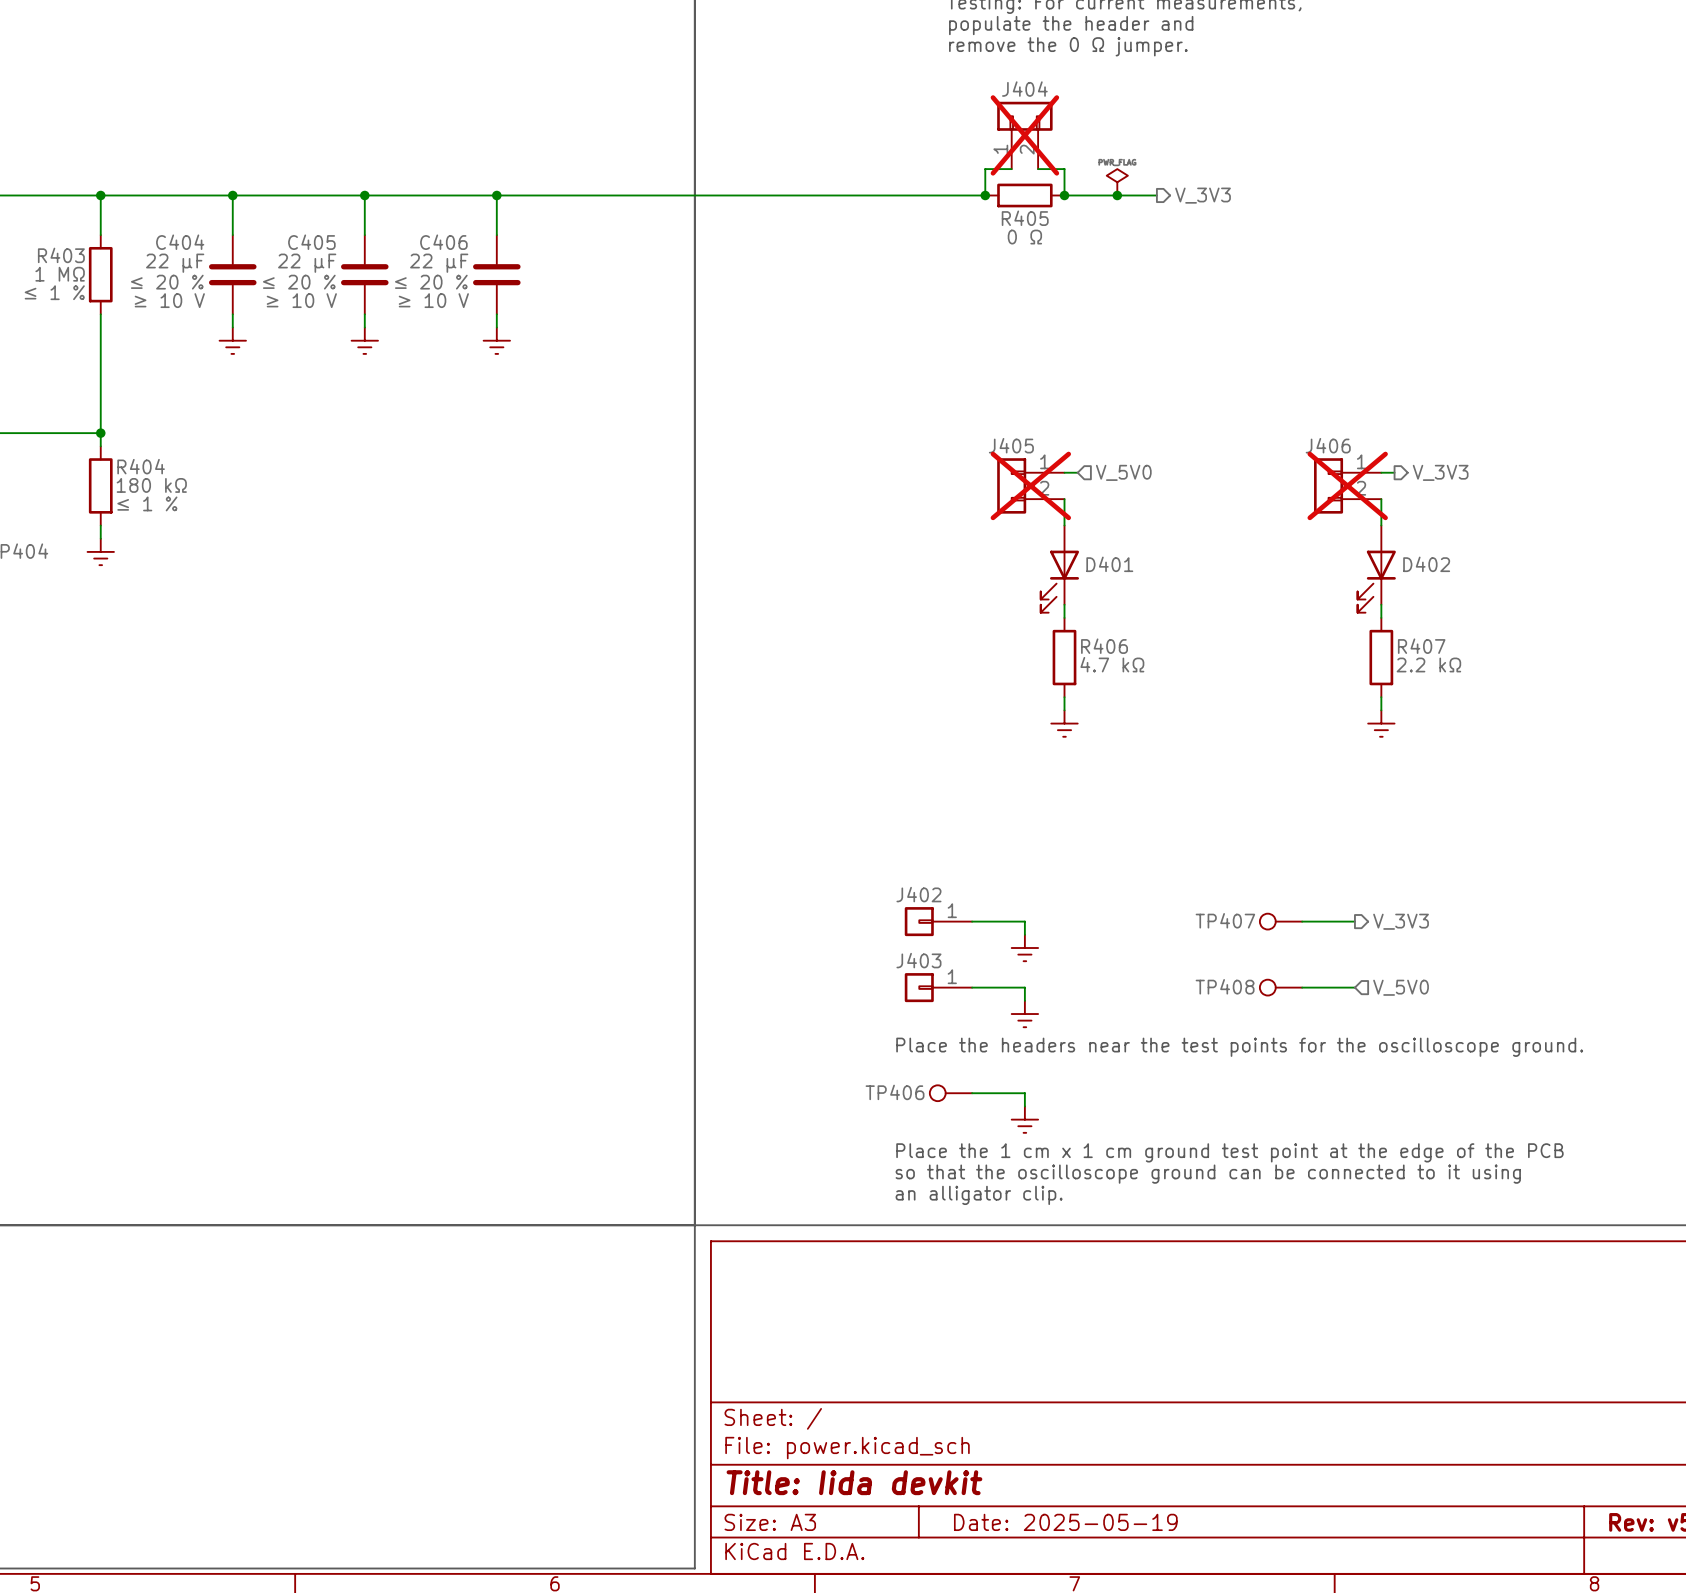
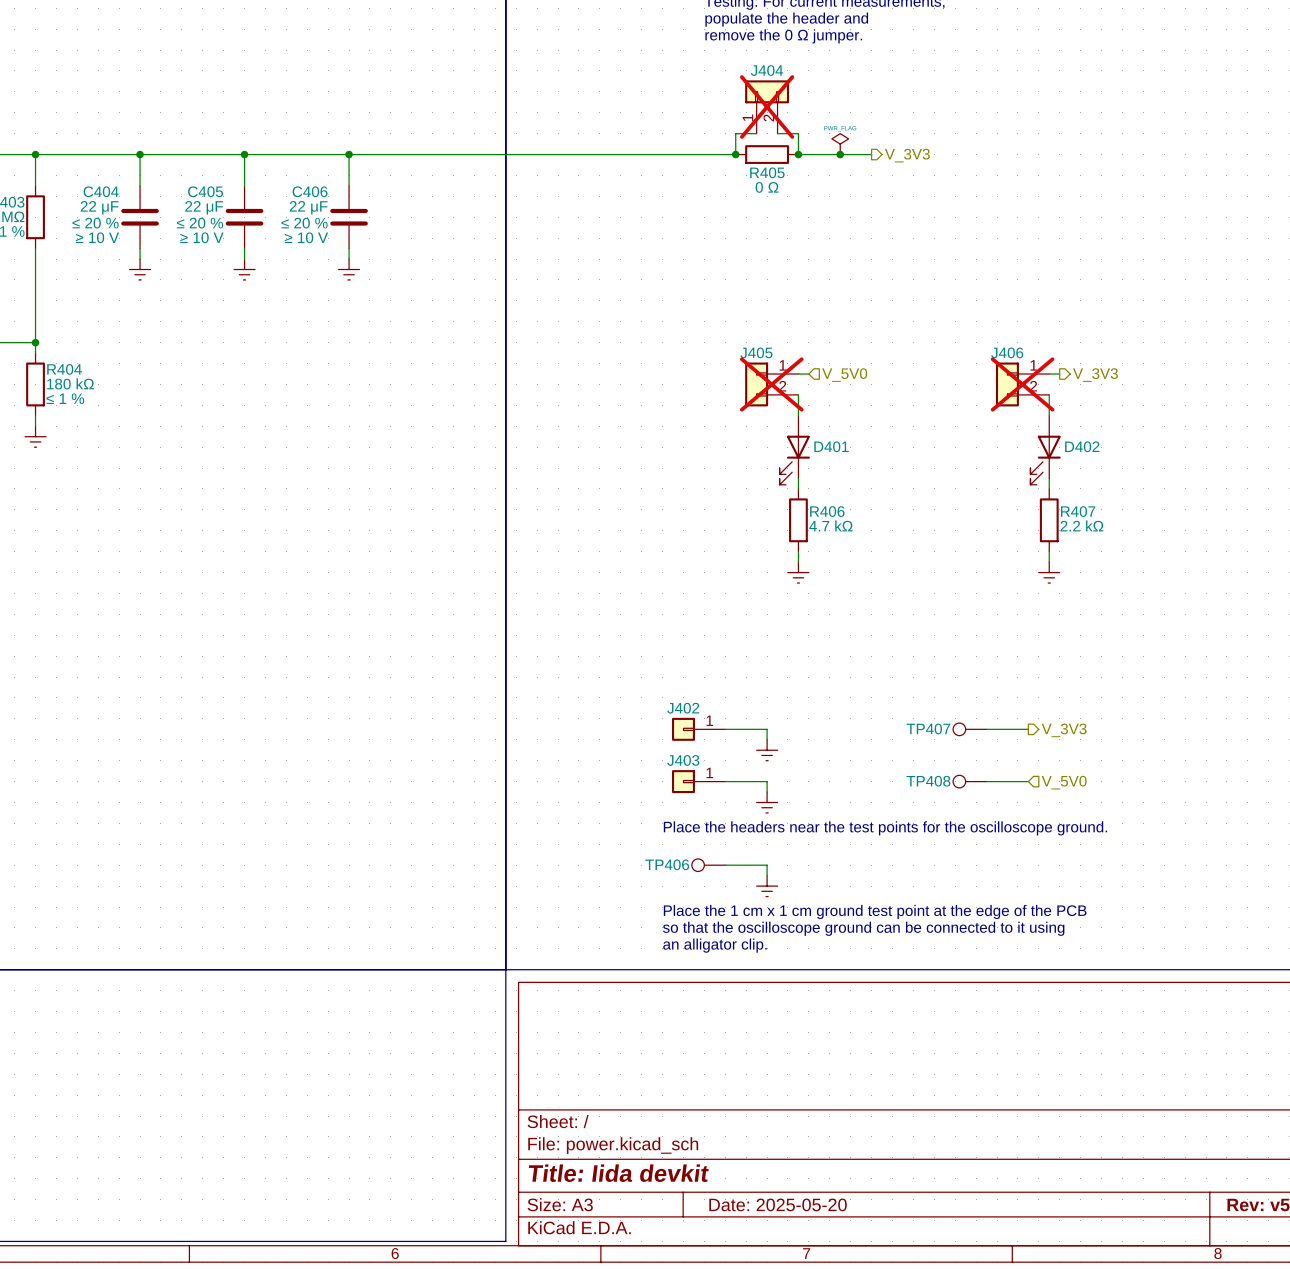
title block: Date: 2025-05-19 (1065, 1522) -> Date: 2025-05-20 (778, 1204)

